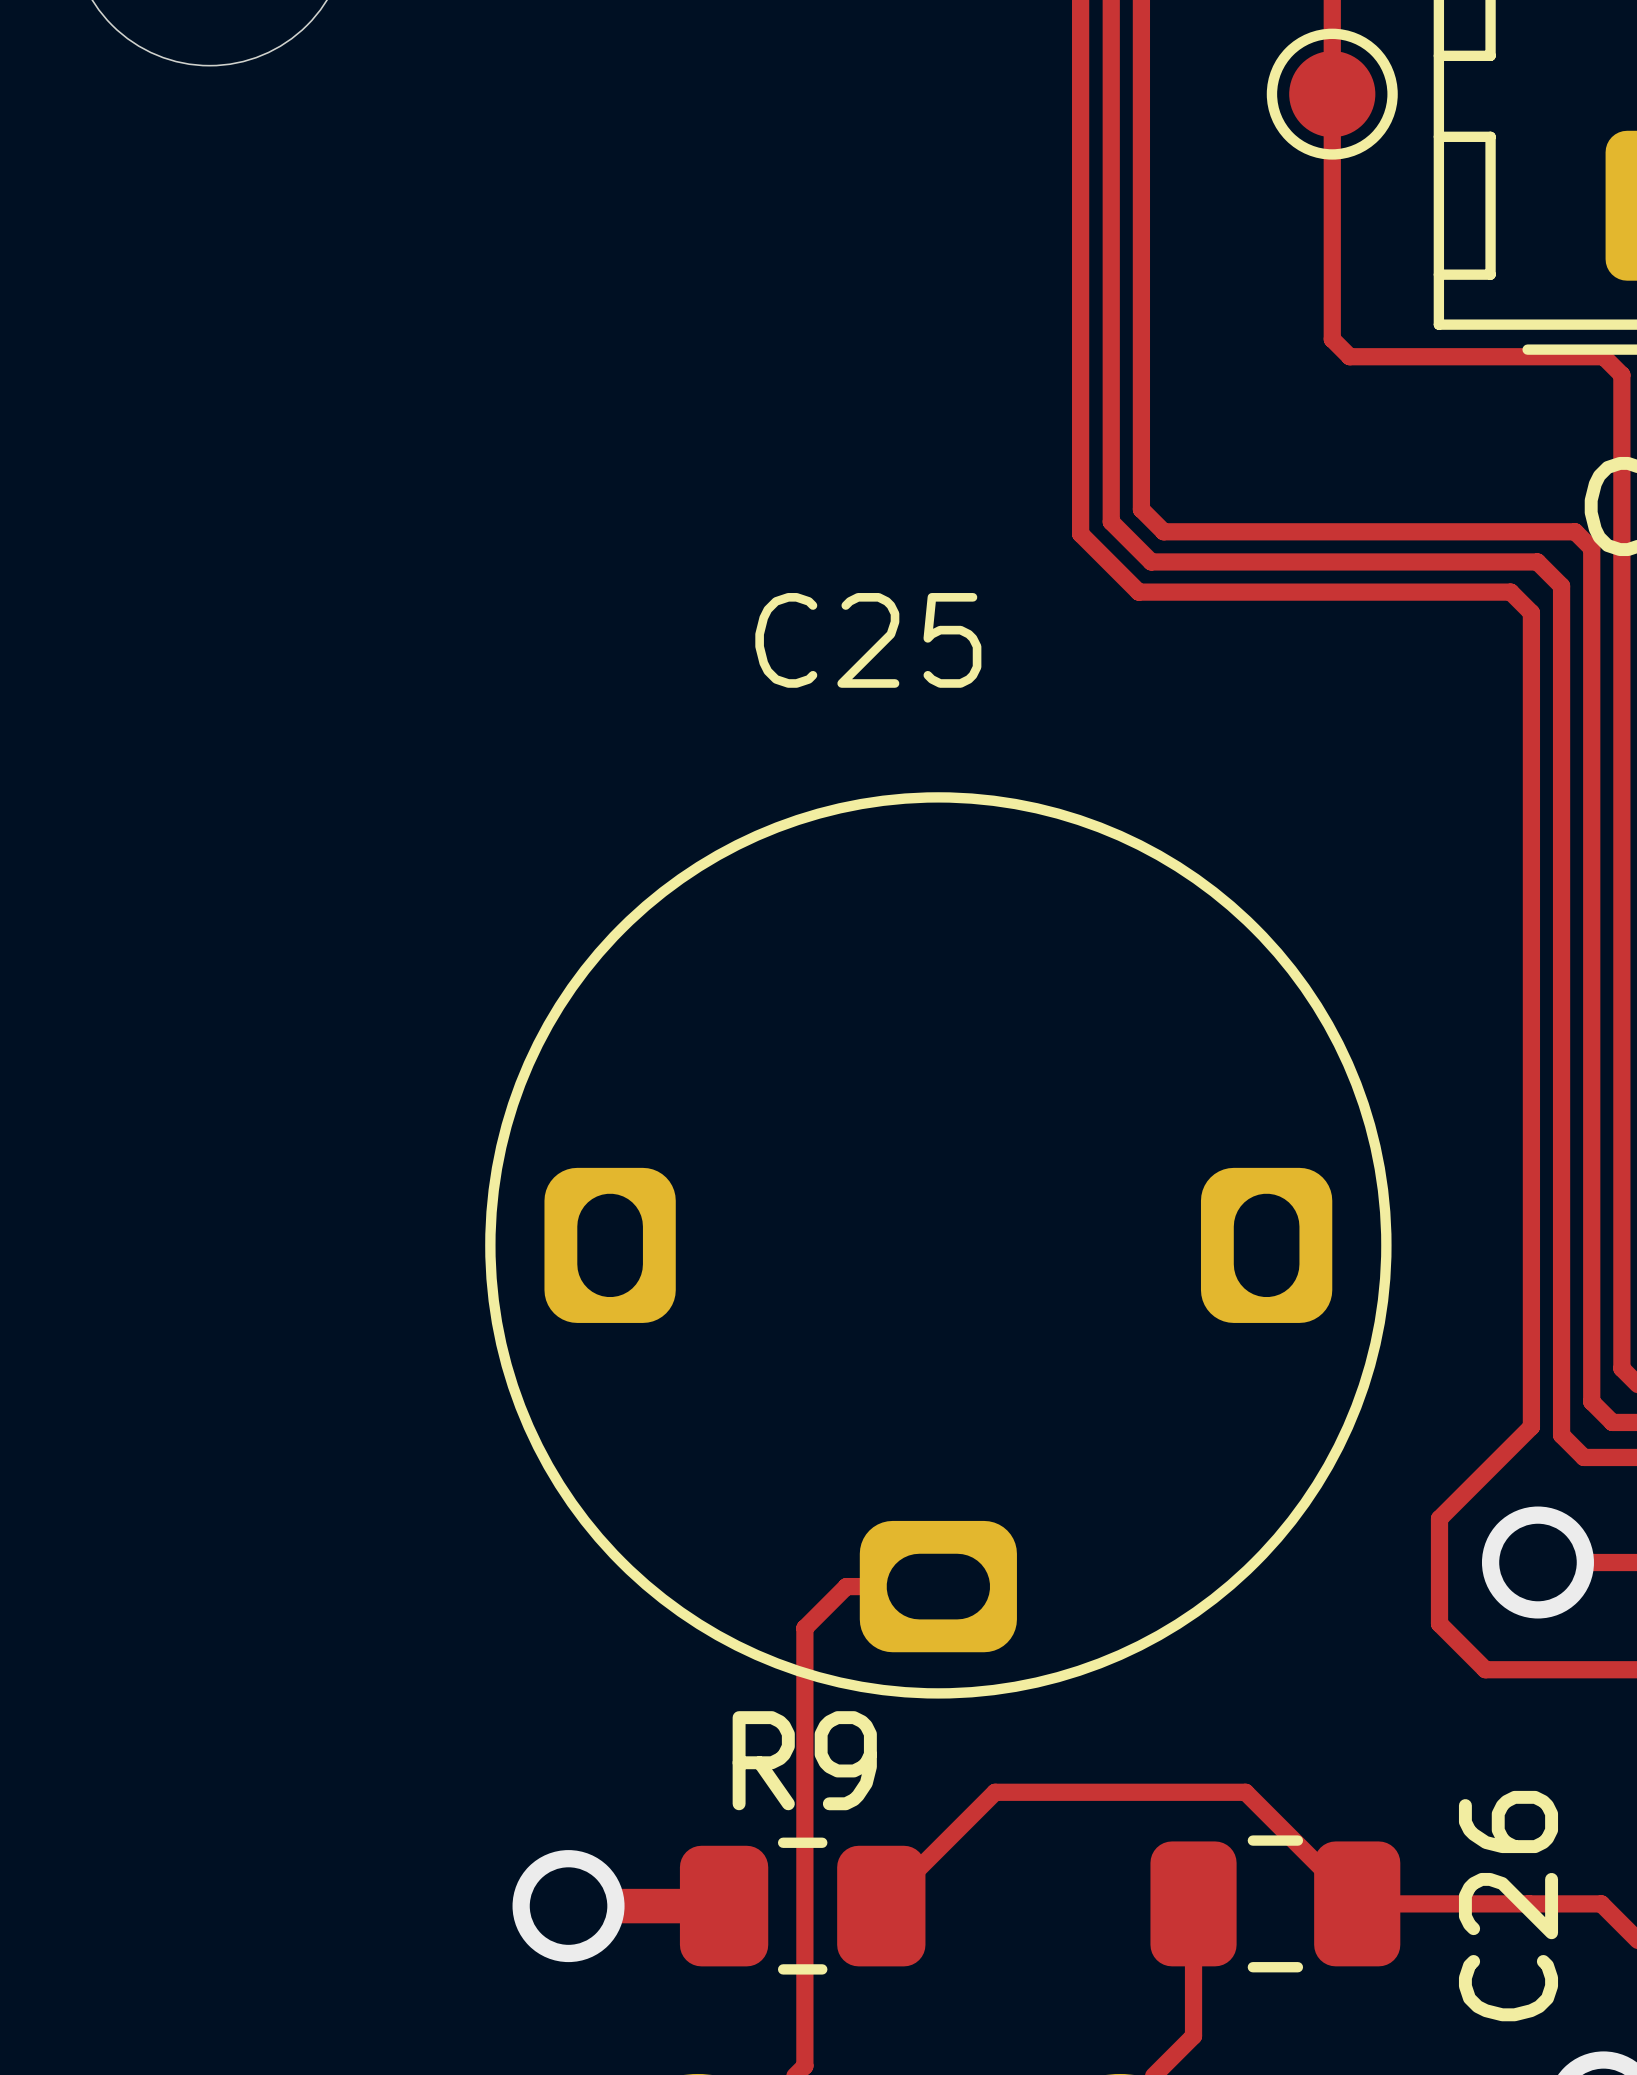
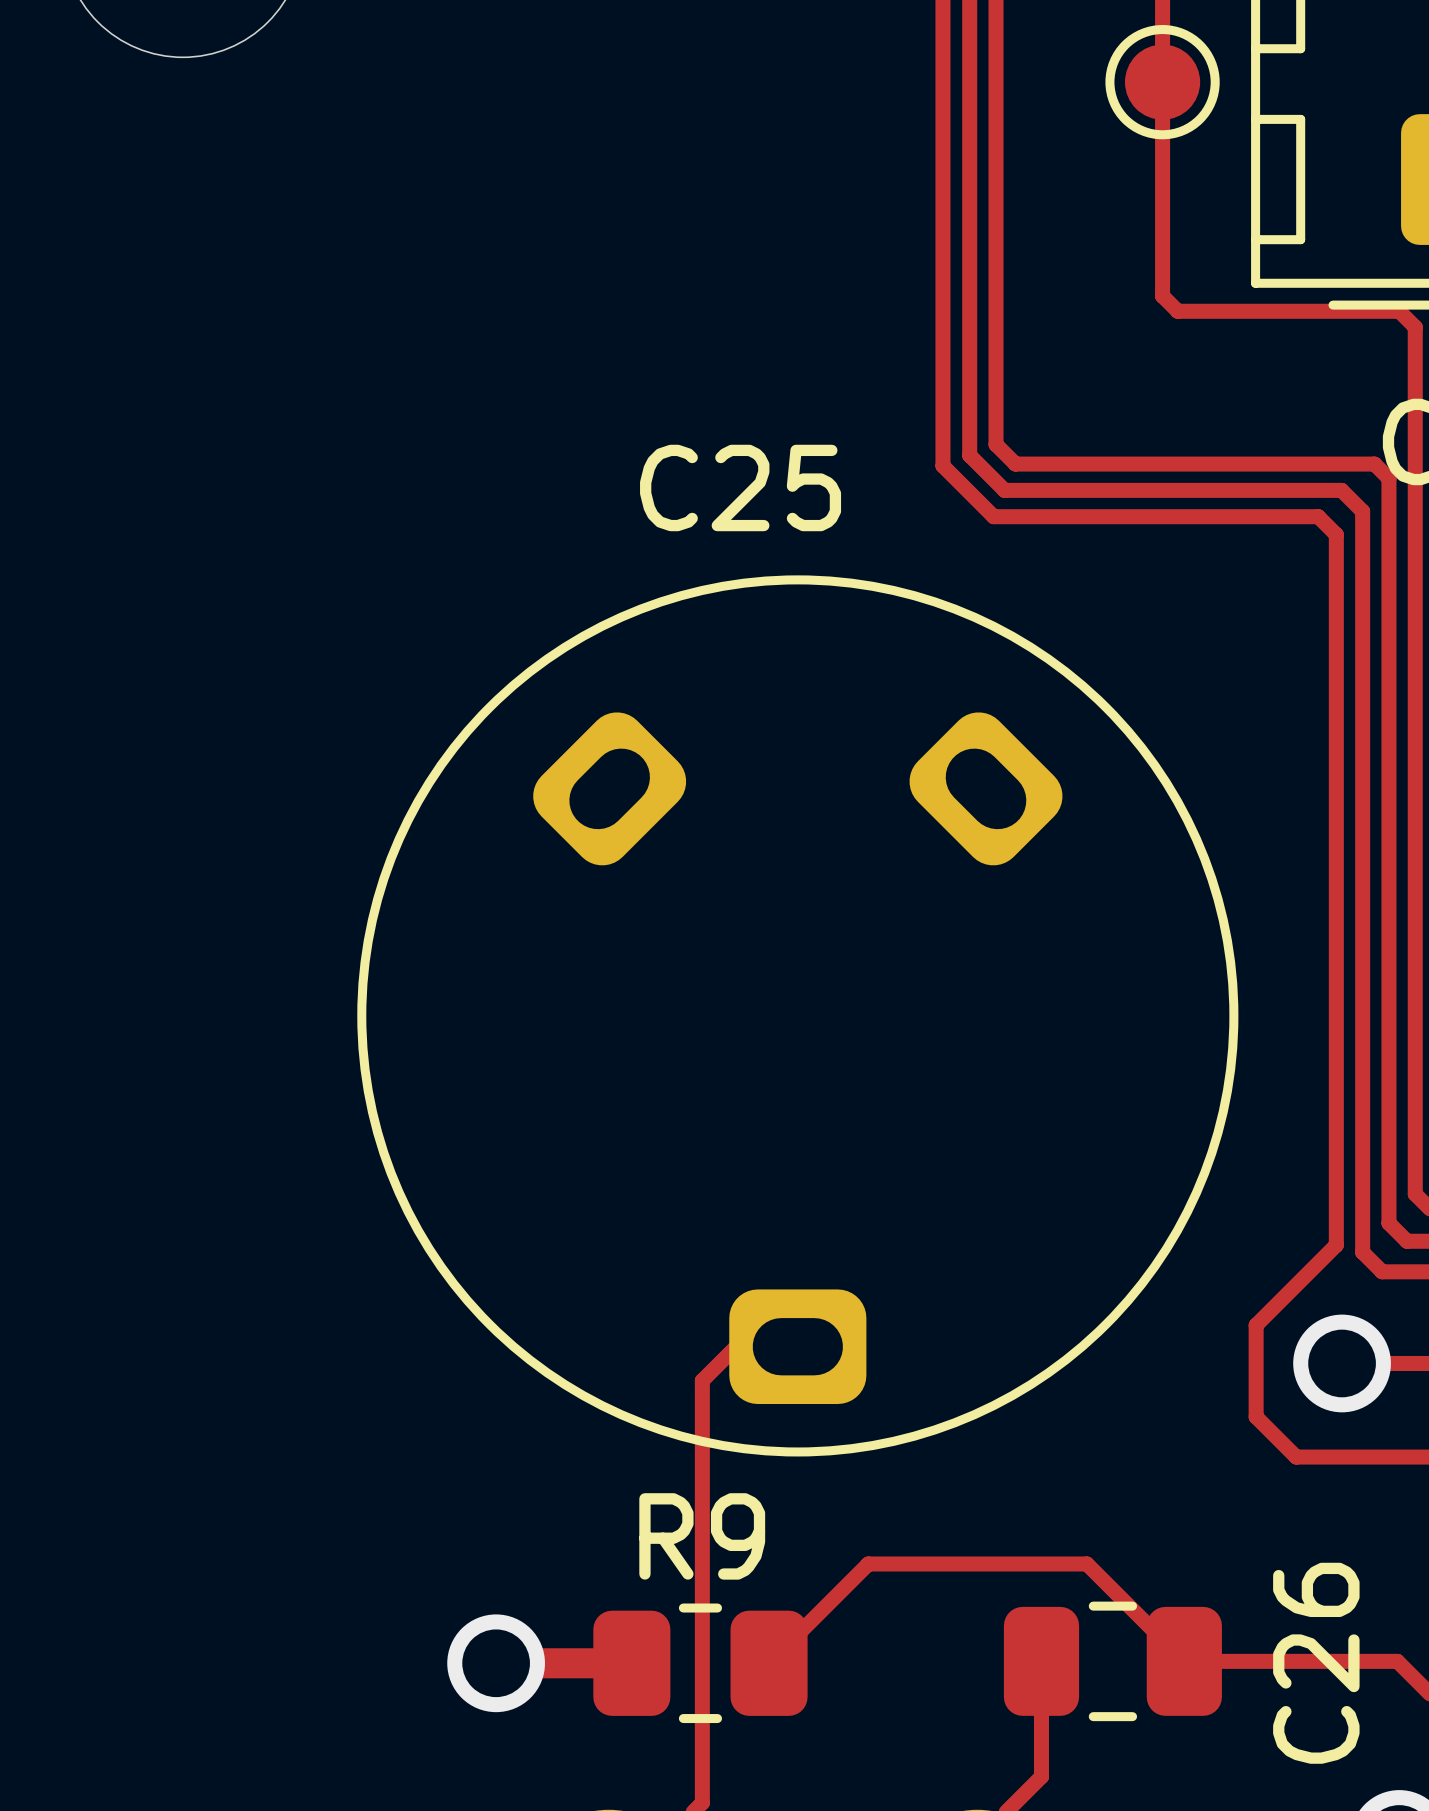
C25 footprint: [485, 792, 1392, 1699] -> [357, 575, 1239, 1457]
track: (938, 1586) (846, 1586) (804, 1628) -> (797, 1346) (736, 1346) (702, 1380) (702, 1420)

